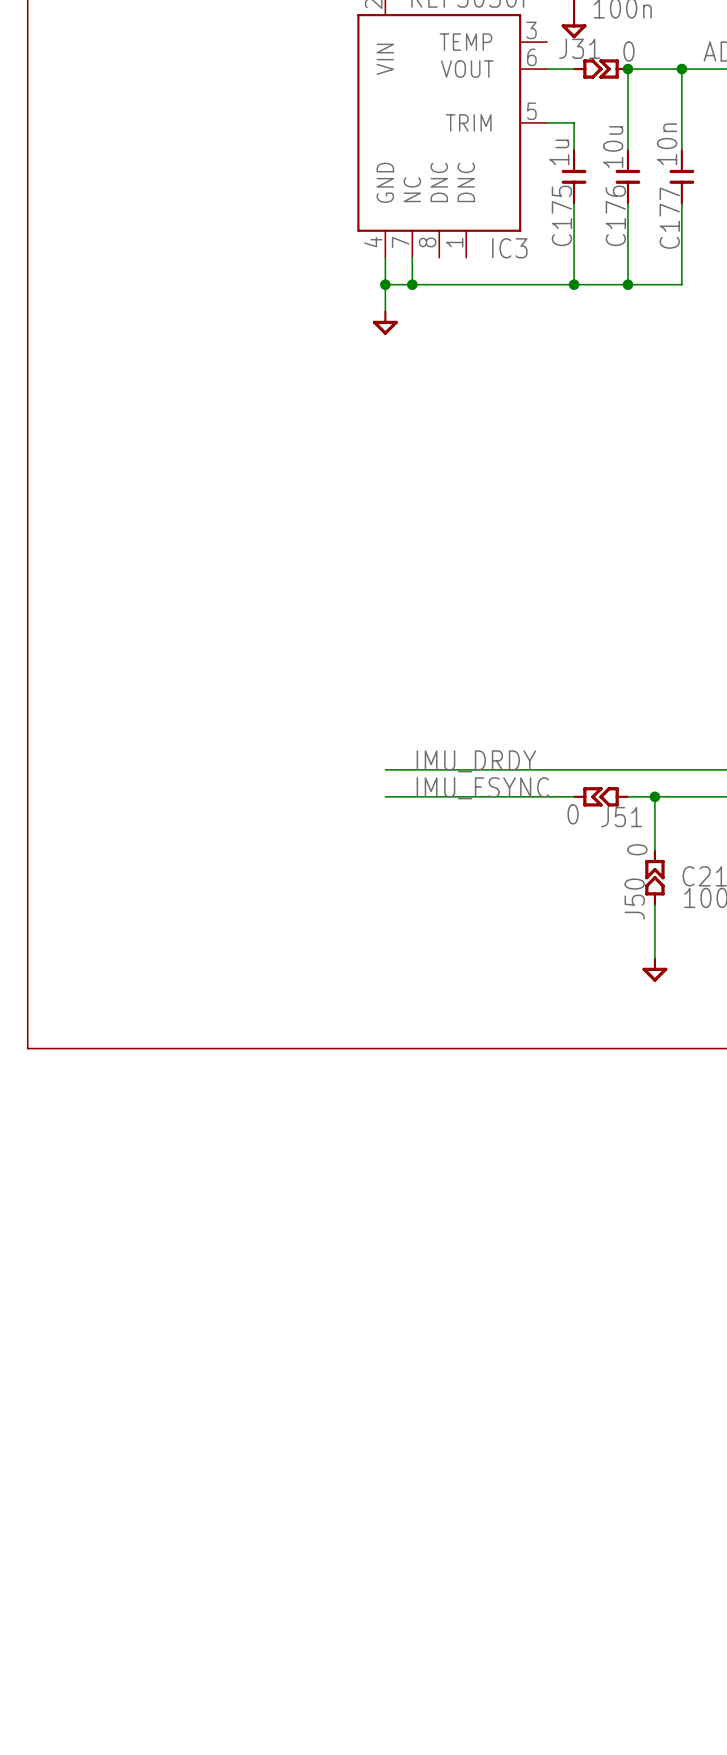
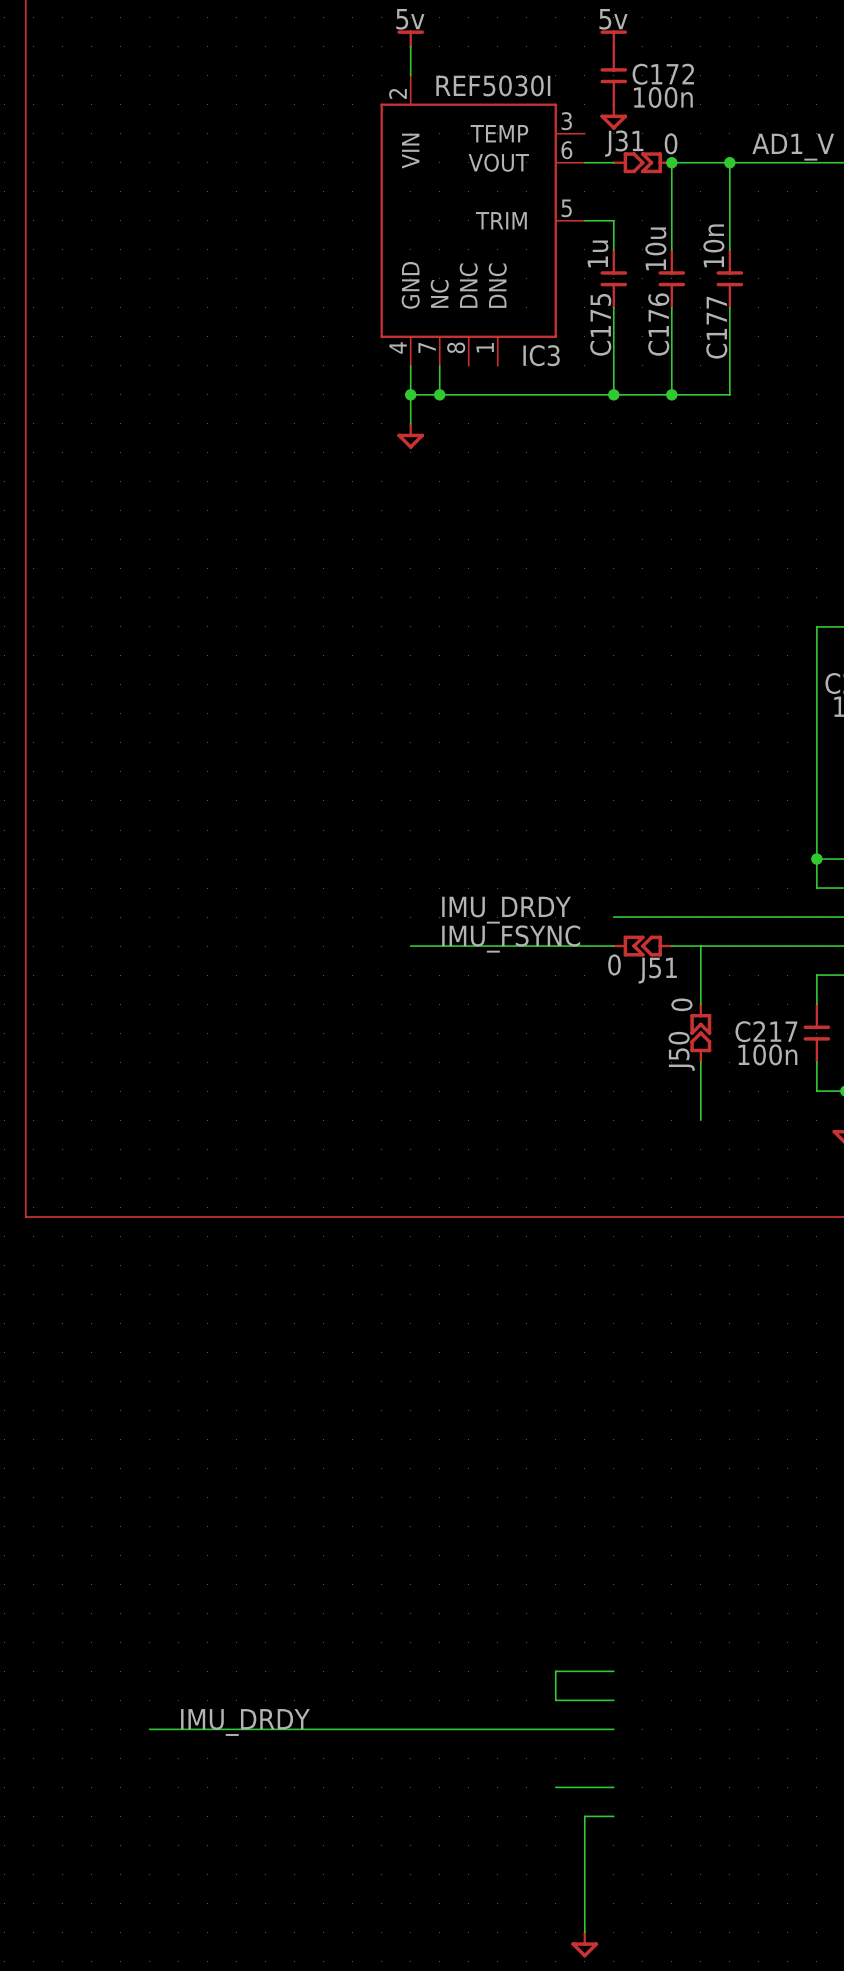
wire: (385, 769) (574, 769) -> none
junction: (654, 796) -> none
power symbol: (654, 969) -> none
wire: none -> (613, 1671) (555, 1671) (555, 1700) (613, 1700)
label: none -> IMU_DRDY (245, 1722)
wire: none -> (149, 1729) (613, 1729)
wire: none -> (555, 1787) (613, 1787)
wire: none -> (613, 1816) (584, 1816) (584, 1932)
power symbol: none -> (584, 1944)

